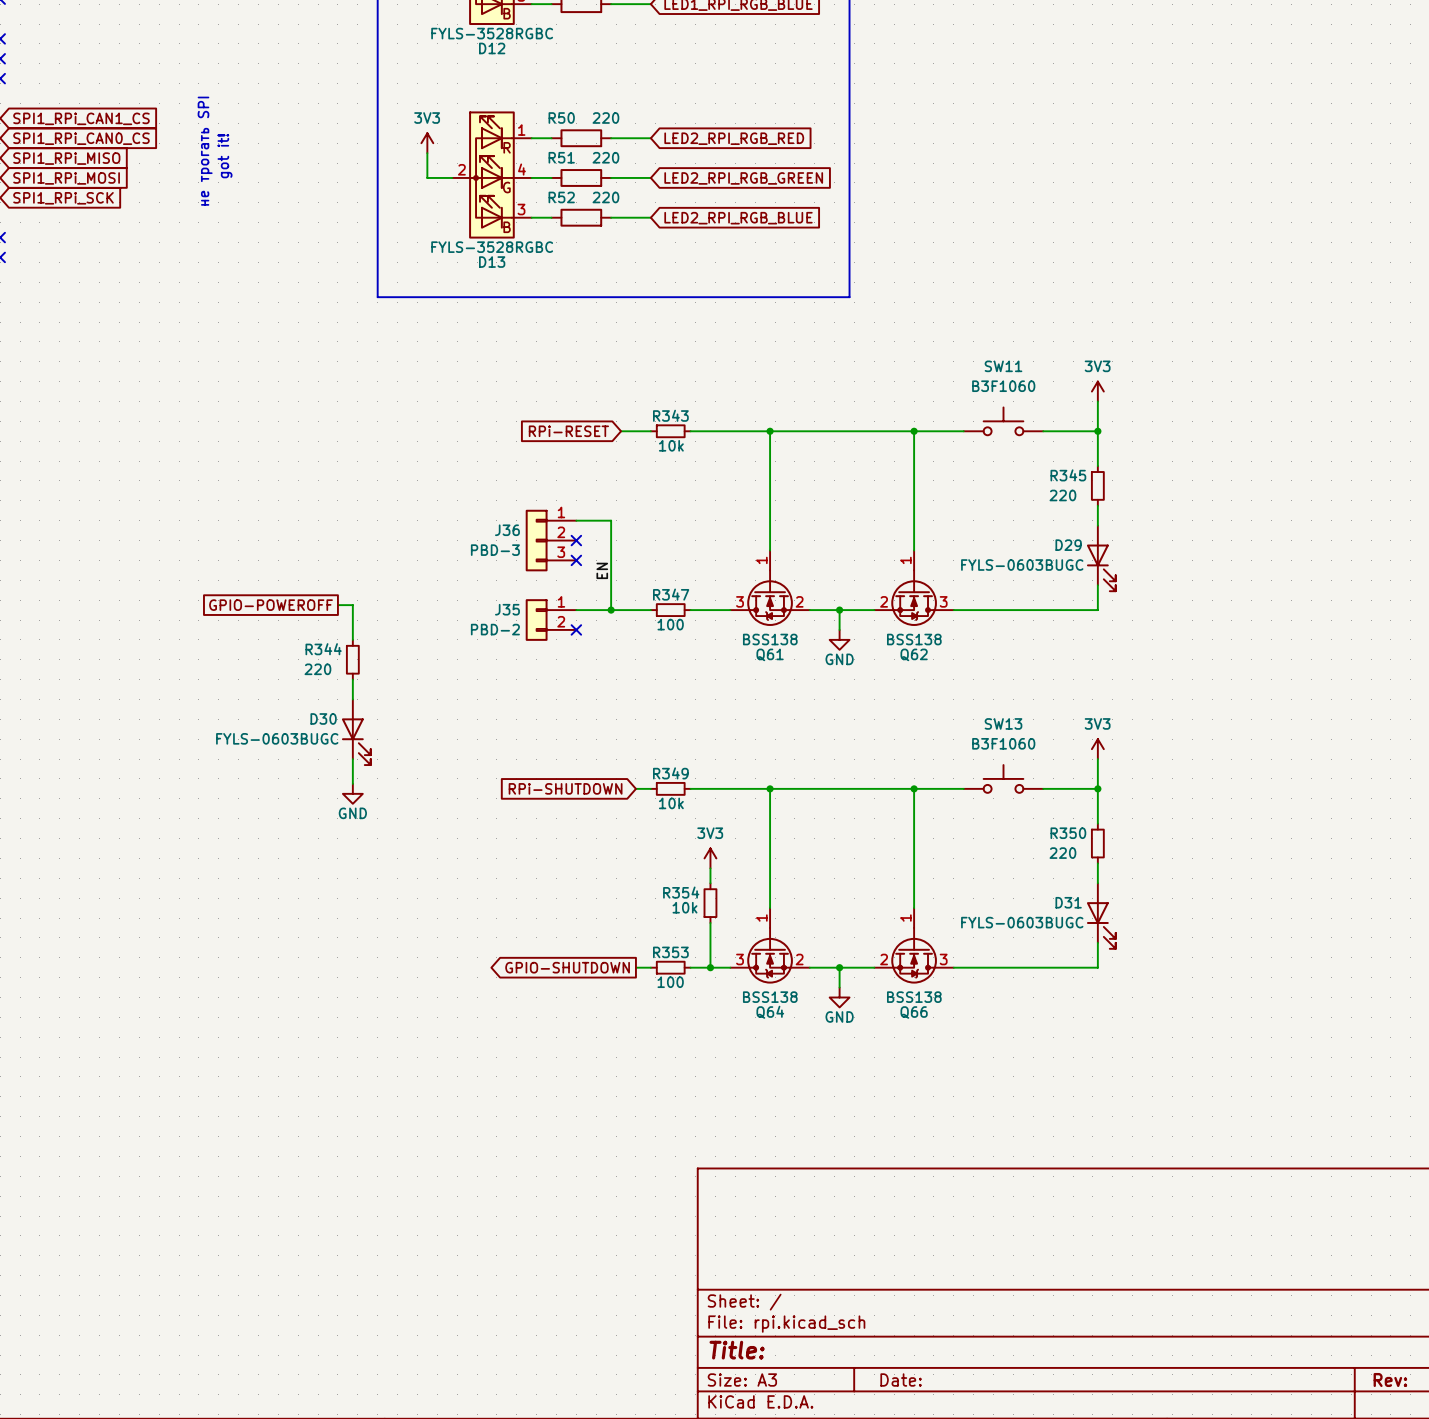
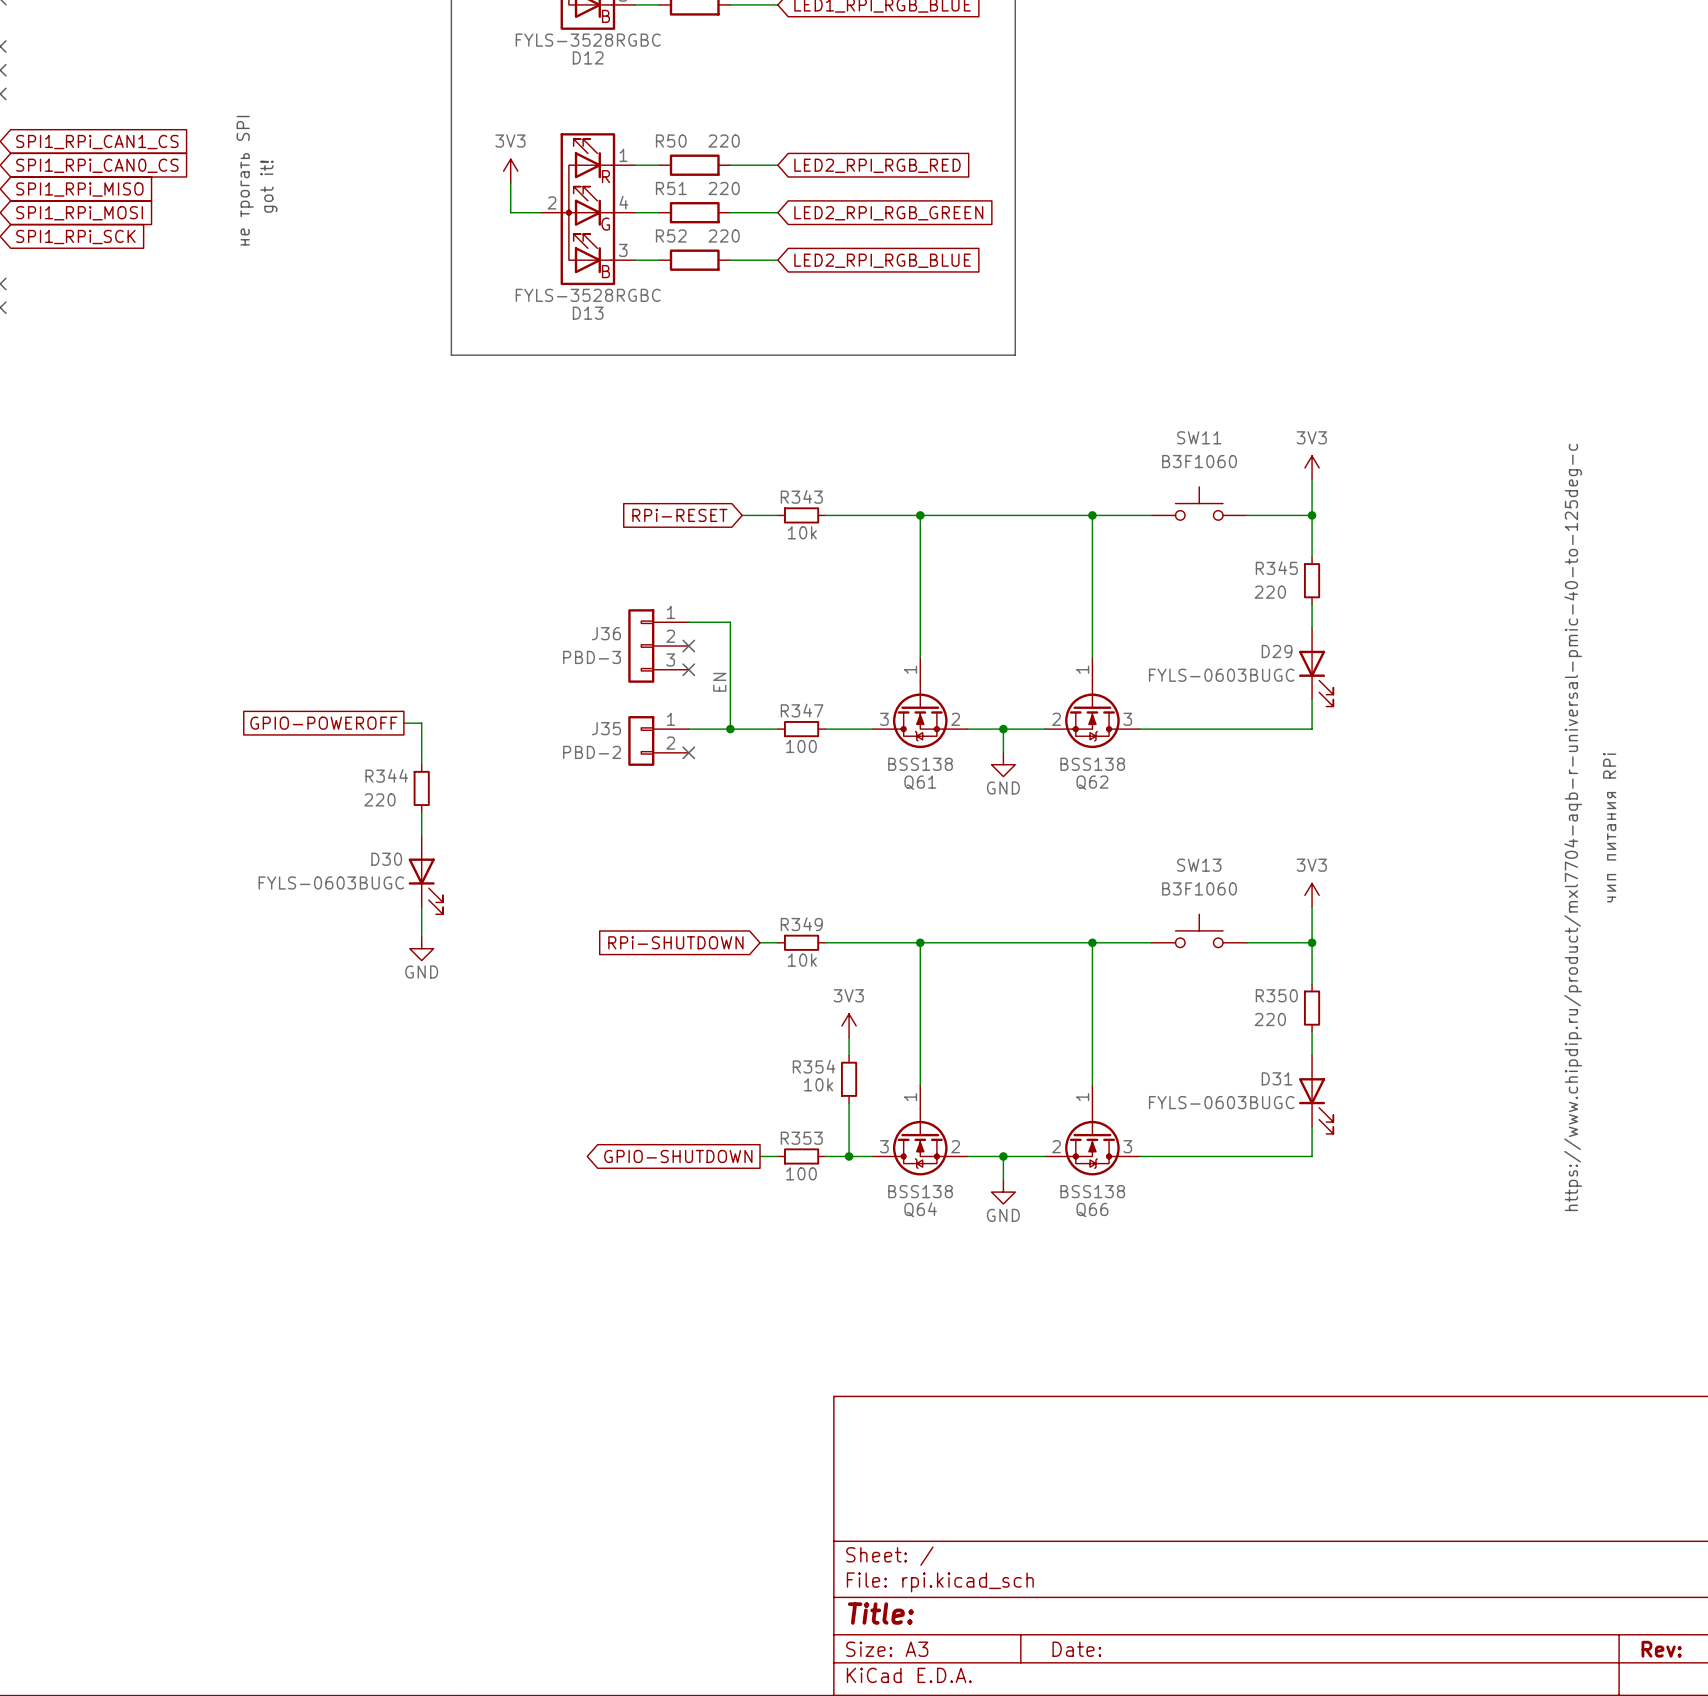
text: none -> https://www.chipdip.ru/product/mxl7704-aqb-r-universal-pmic-40-to-125deg-c (1573, 827)
text: none -> чип питания RPi (1609, 827)

